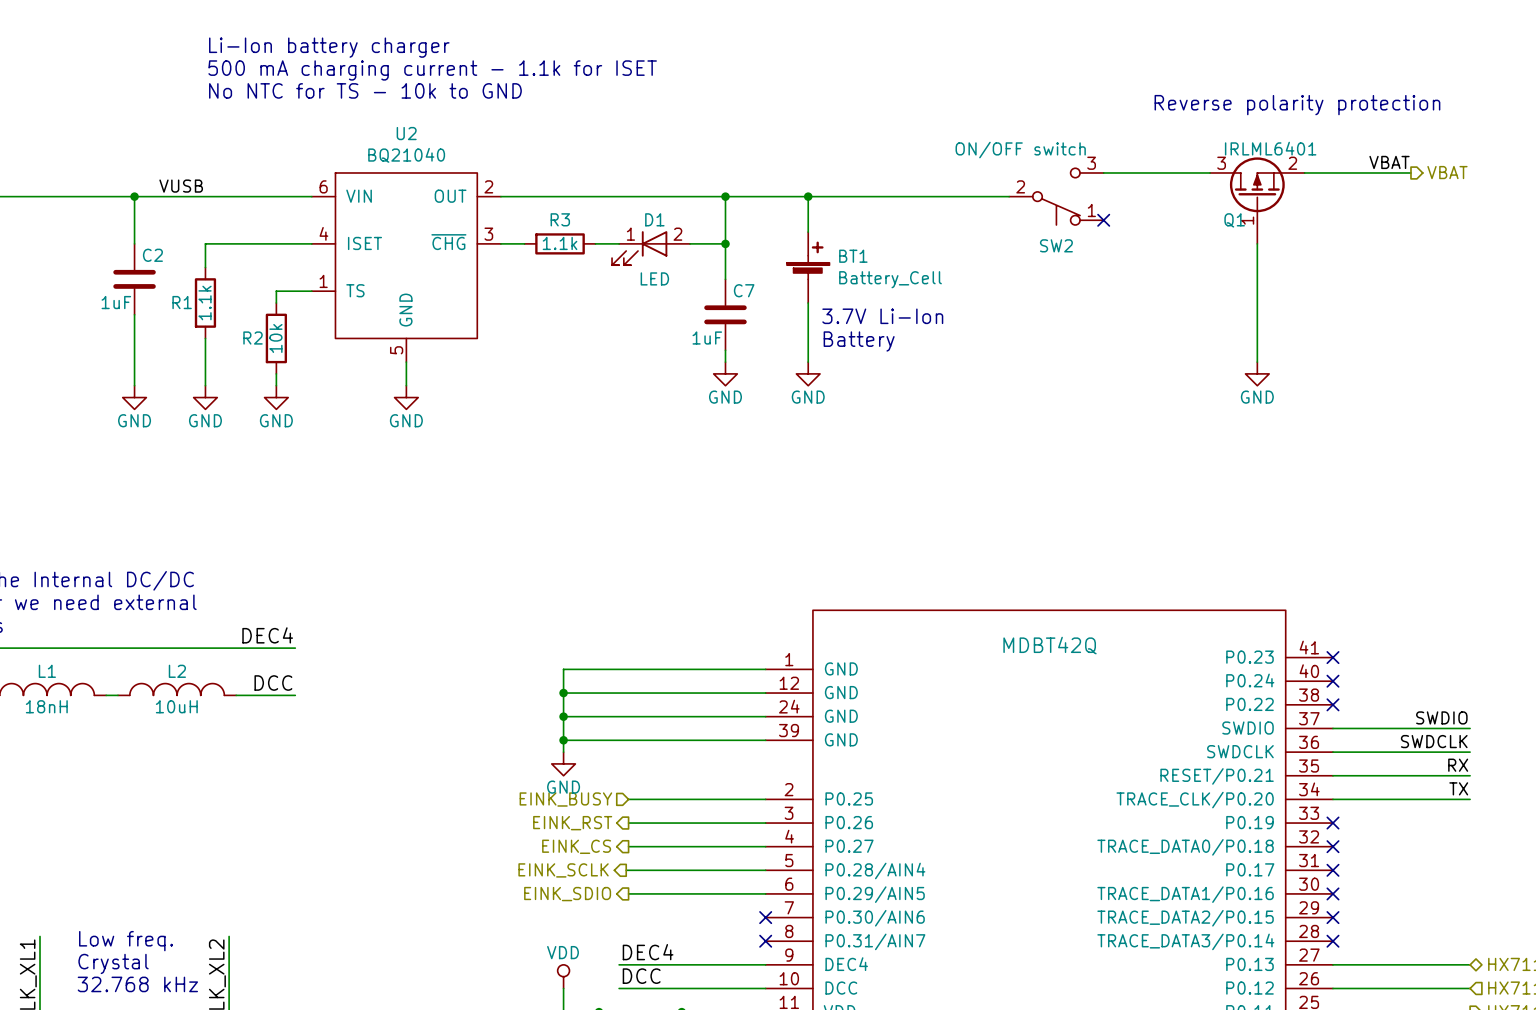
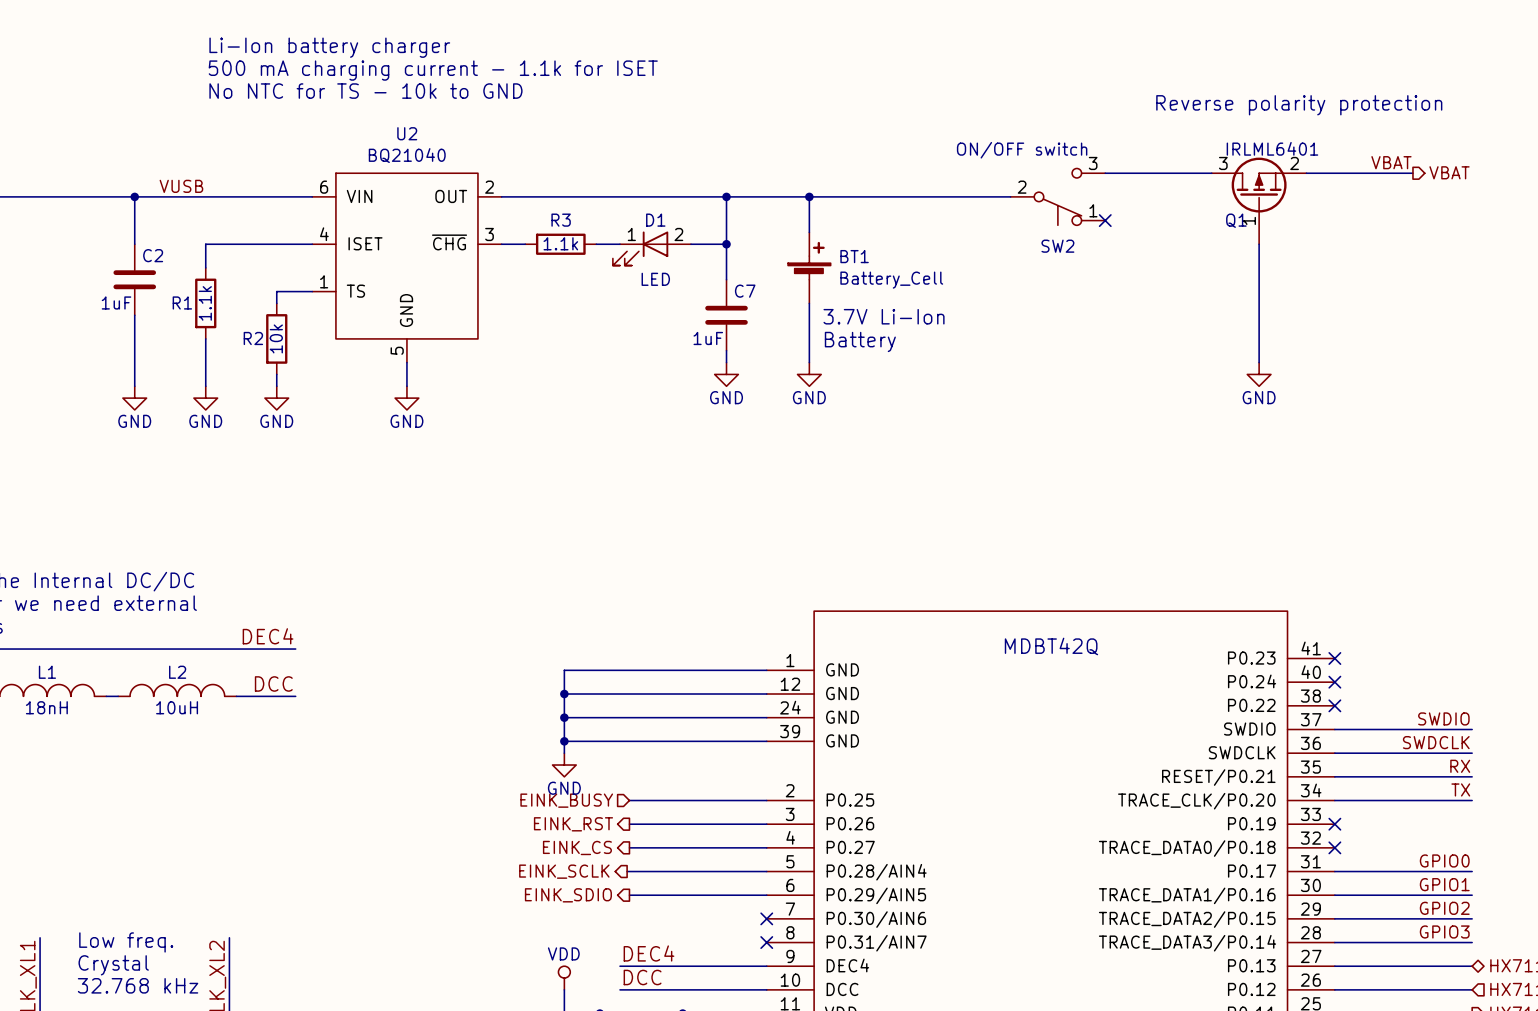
label: none -> GPIO0 (1444, 860)
wire: none -> (1334, 871) (1472, 871)
no-connect mark: (1332, 870) -> none
label: none -> GPIO1 (1444, 884)
wire: none -> (1334, 895) (1472, 895)
no-connect mark: (1332, 893) -> none
label: none -> GPIO2 (1444, 908)
wire: none -> (1334, 918) (1472, 918)
no-connect mark: (1332, 917) -> none
label: none -> GPIO3 (1444, 931)
wire: none -> (1334, 942) (1472, 942)
no-connect mark: (1332, 941) -> none

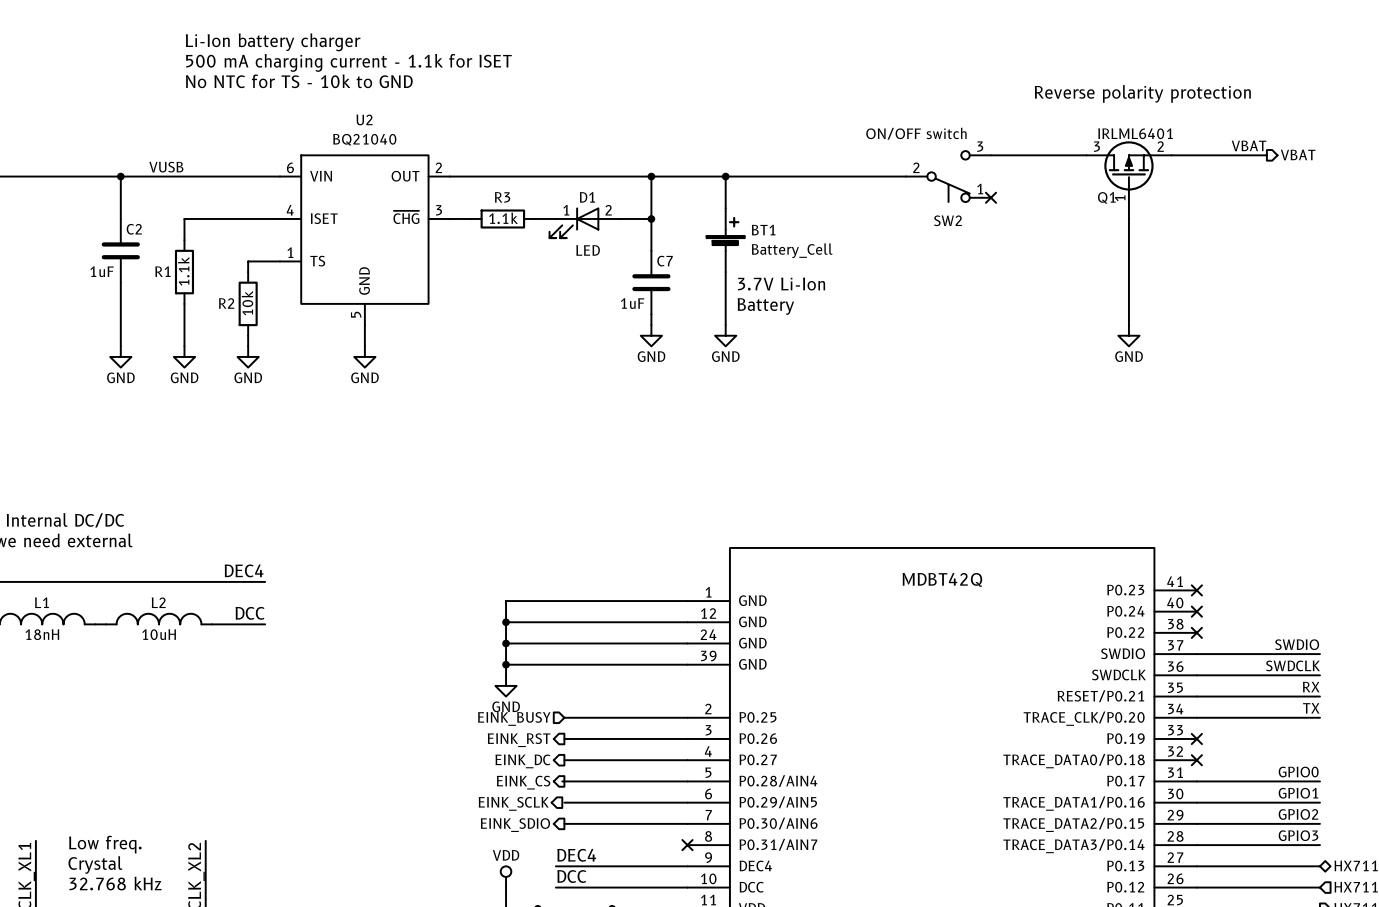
hierarchical label: EINK_CS (577, 847) -> EINK_DC (522, 761)
hierarchical label: EINK_SCLK (564, 871) -> EINK_CS (523, 782)
hierarchical label: EINK_SDIO (568, 895) -> EINK_SCLK (513, 803)
wire: none -> (564, 823) (687, 823)
no-connect mark: (766, 918) -> none
hierarchical label: none -> EINK_SDIO (515, 825)

